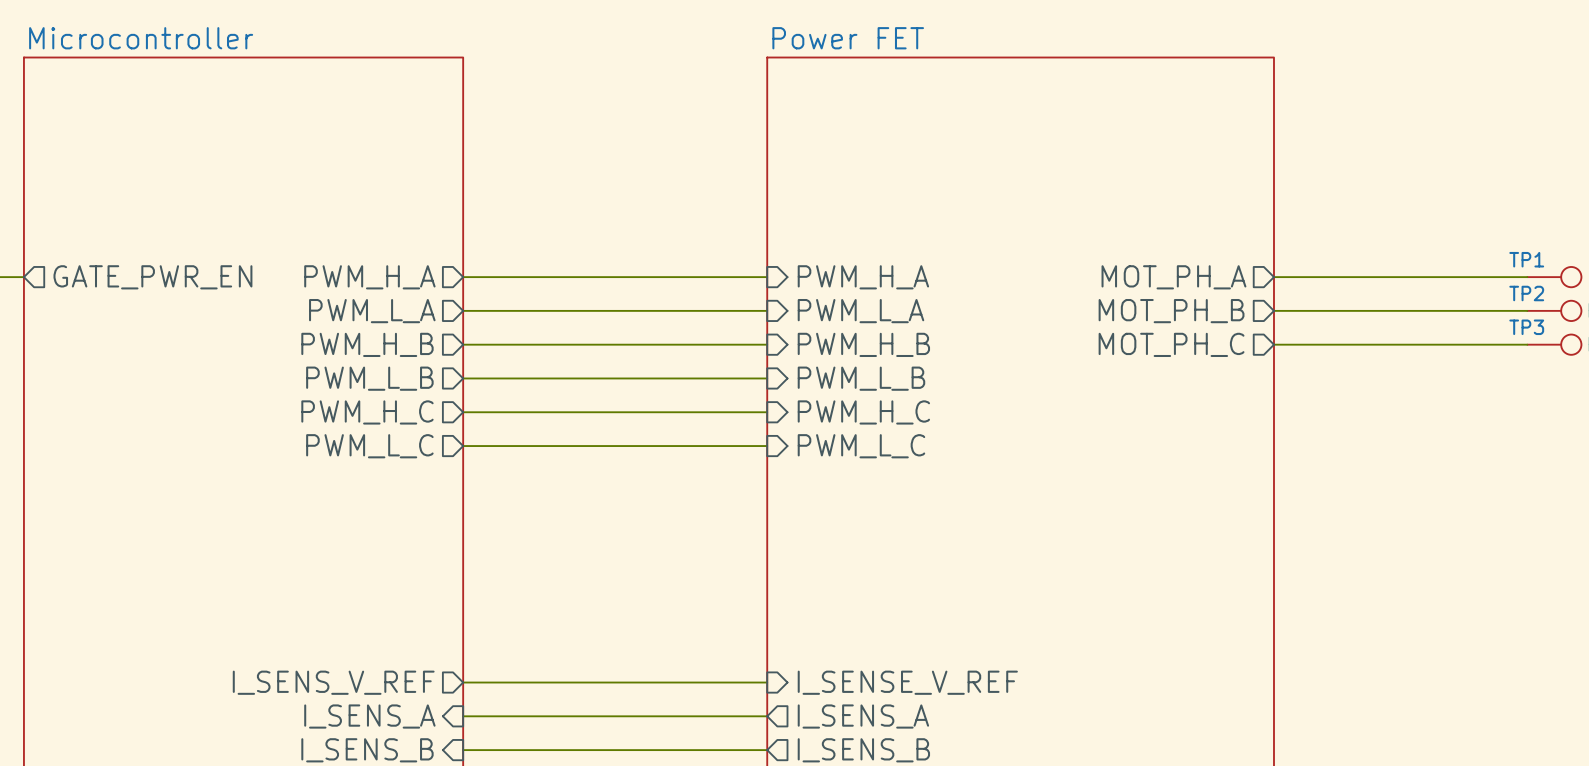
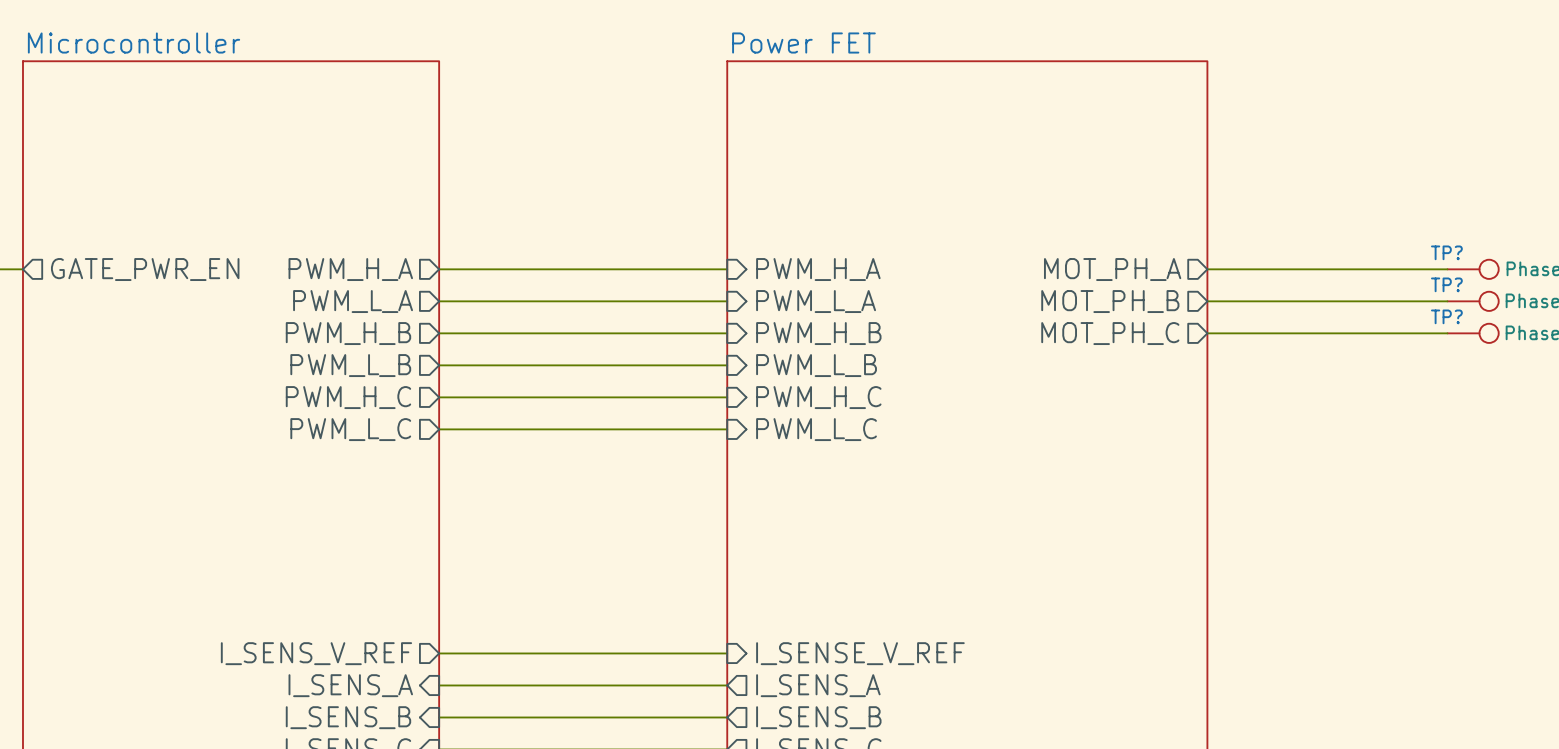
TP1 name: TP1 (1526, 259) -> TP? (1446, 252)
TP2 name: TP2 (1526, 293) -> TP? (1446, 284)
TP3 name: TP3 (1526, 327) -> TP? (1446, 316)

